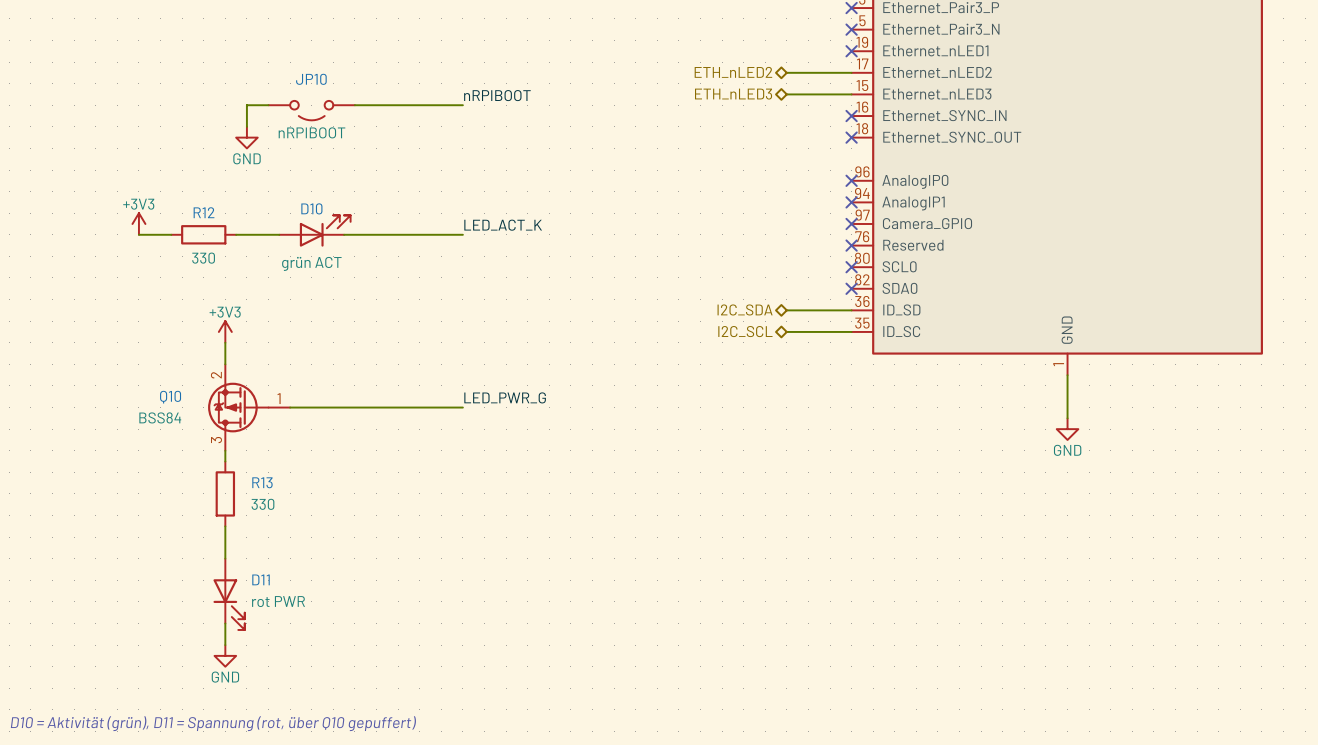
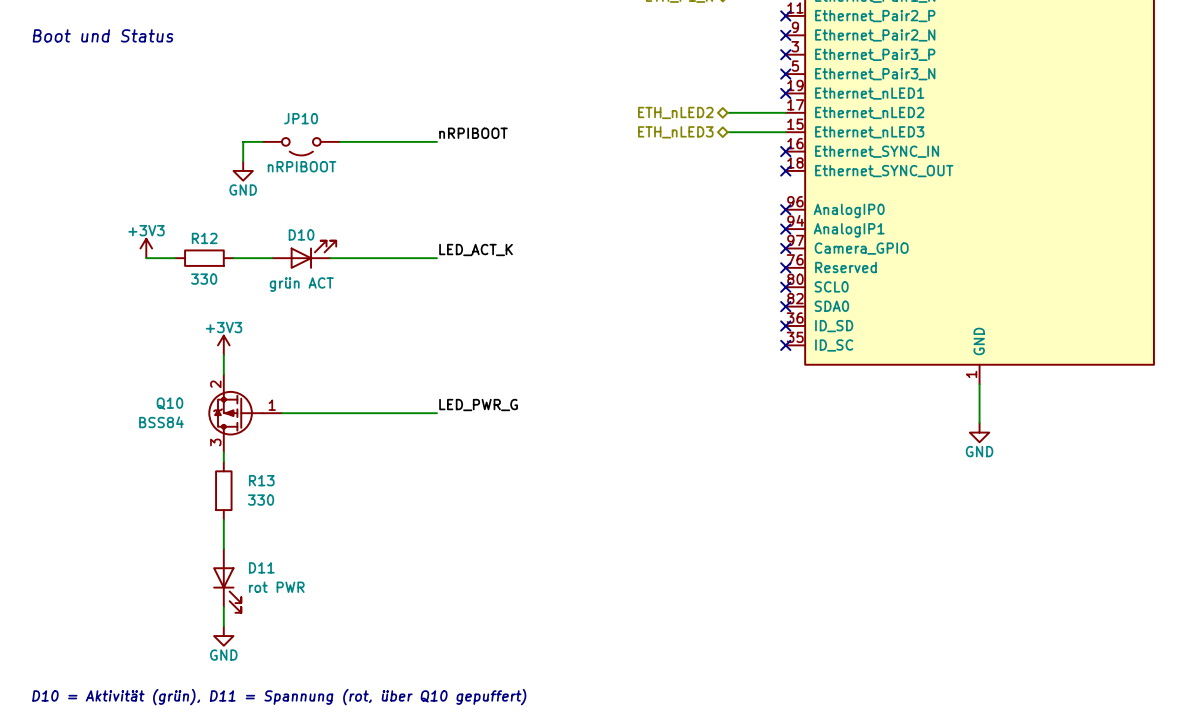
hierarchical label: I2C_SDA (745, 309) -> none
wire: (786, 310) (851, 310) -> none
no-connect mark: none -> (785, 326)
hierarchical label: I2C_SCL (745, 331) -> none
wire: (786, 331) (851, 331) -> none
no-connect mark: none -> (785, 345)

